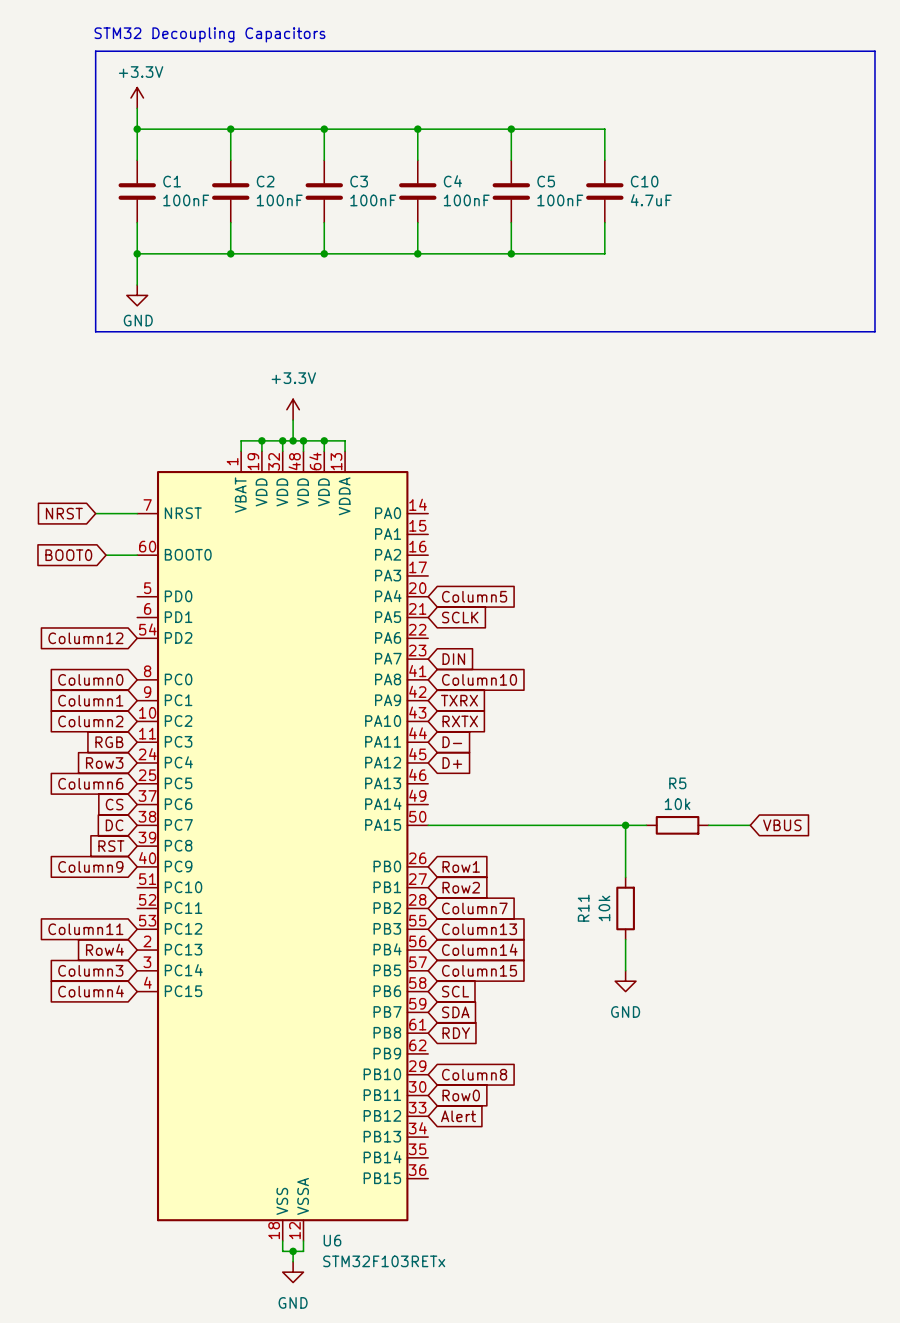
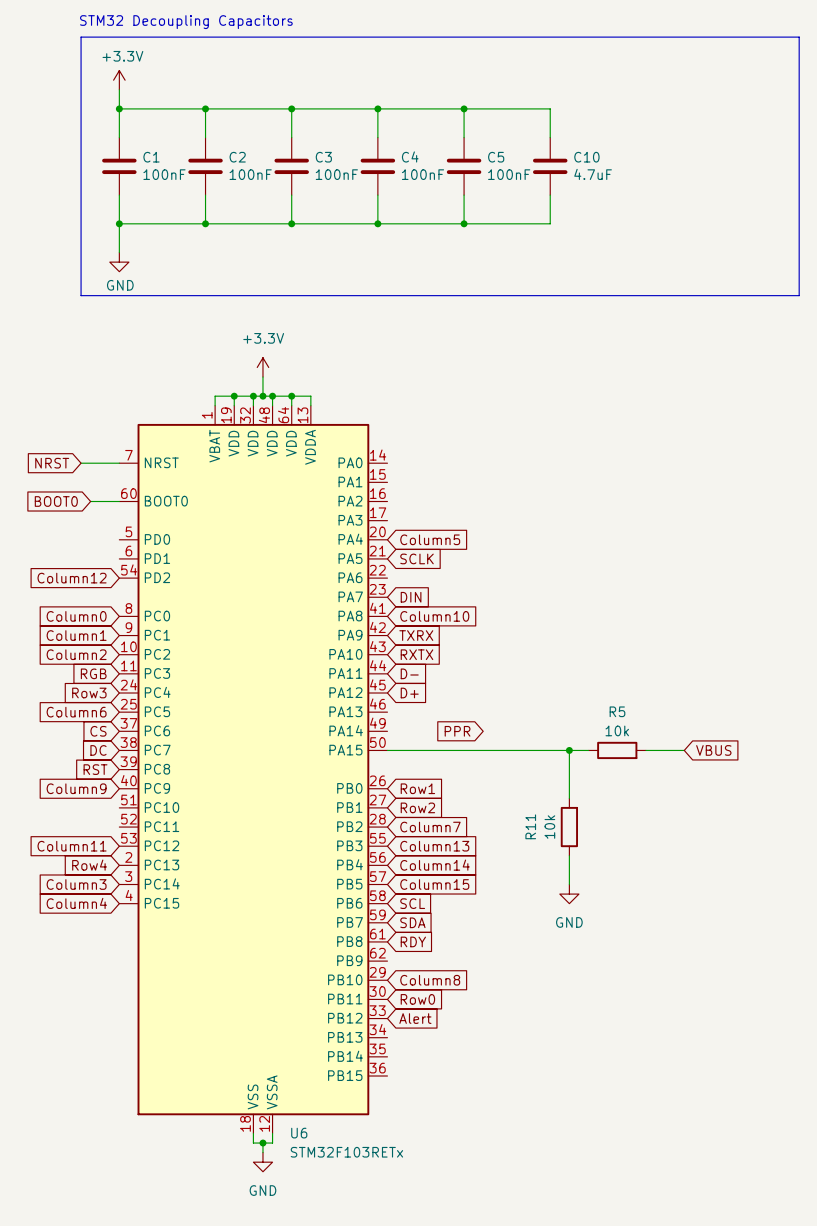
global label: none -> PPR (457, 731)

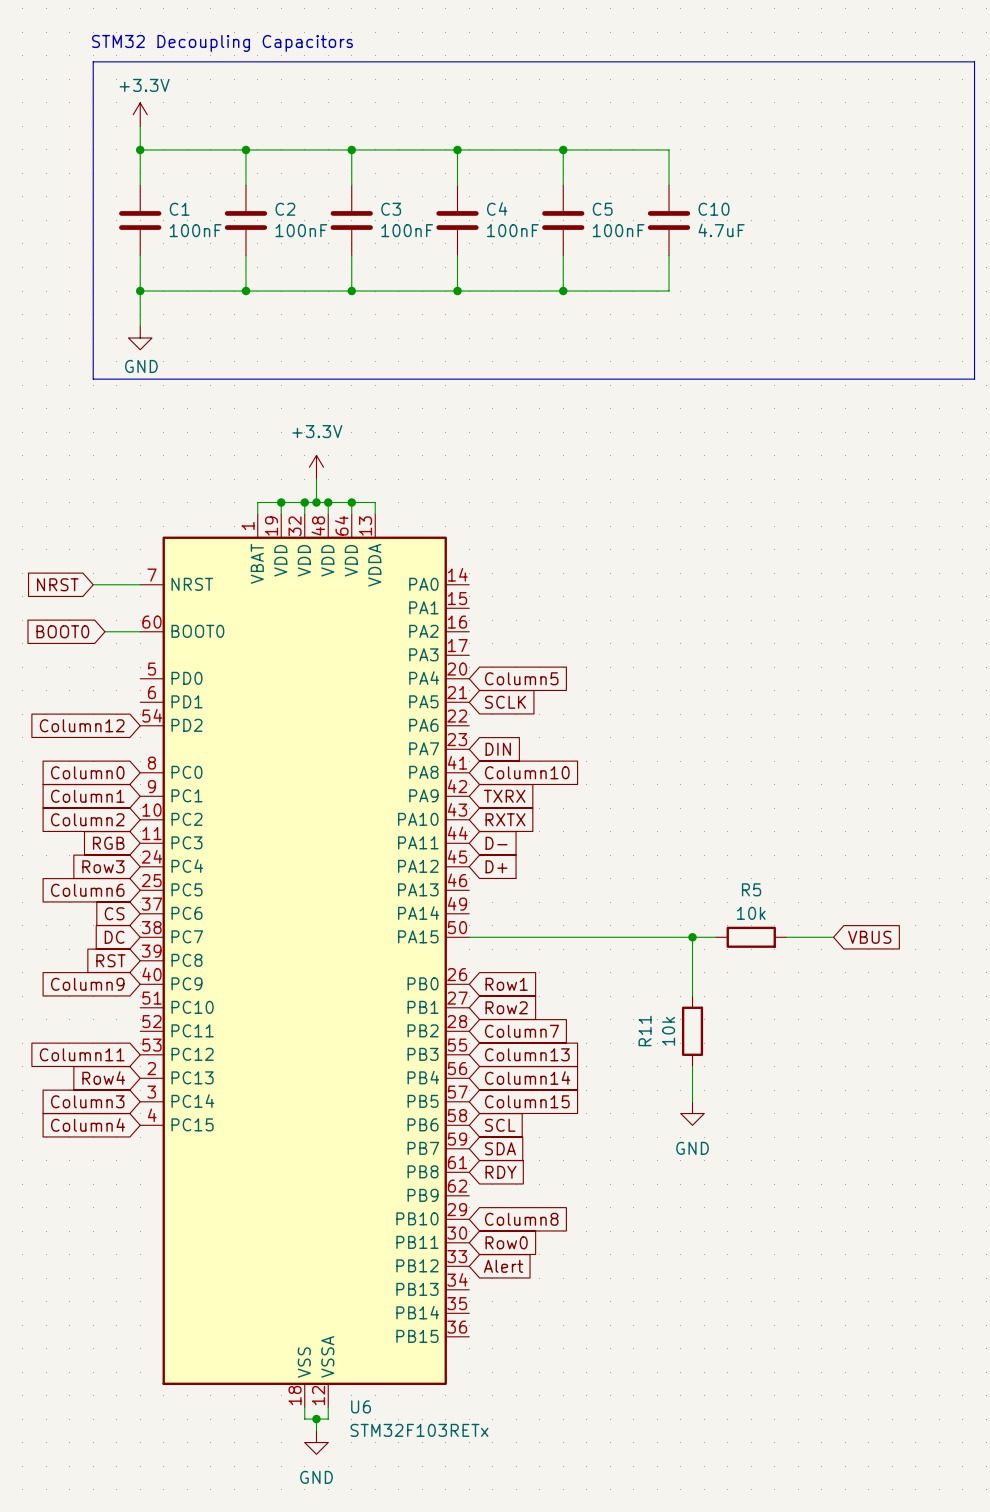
global label: PPR (457, 731) -> none

